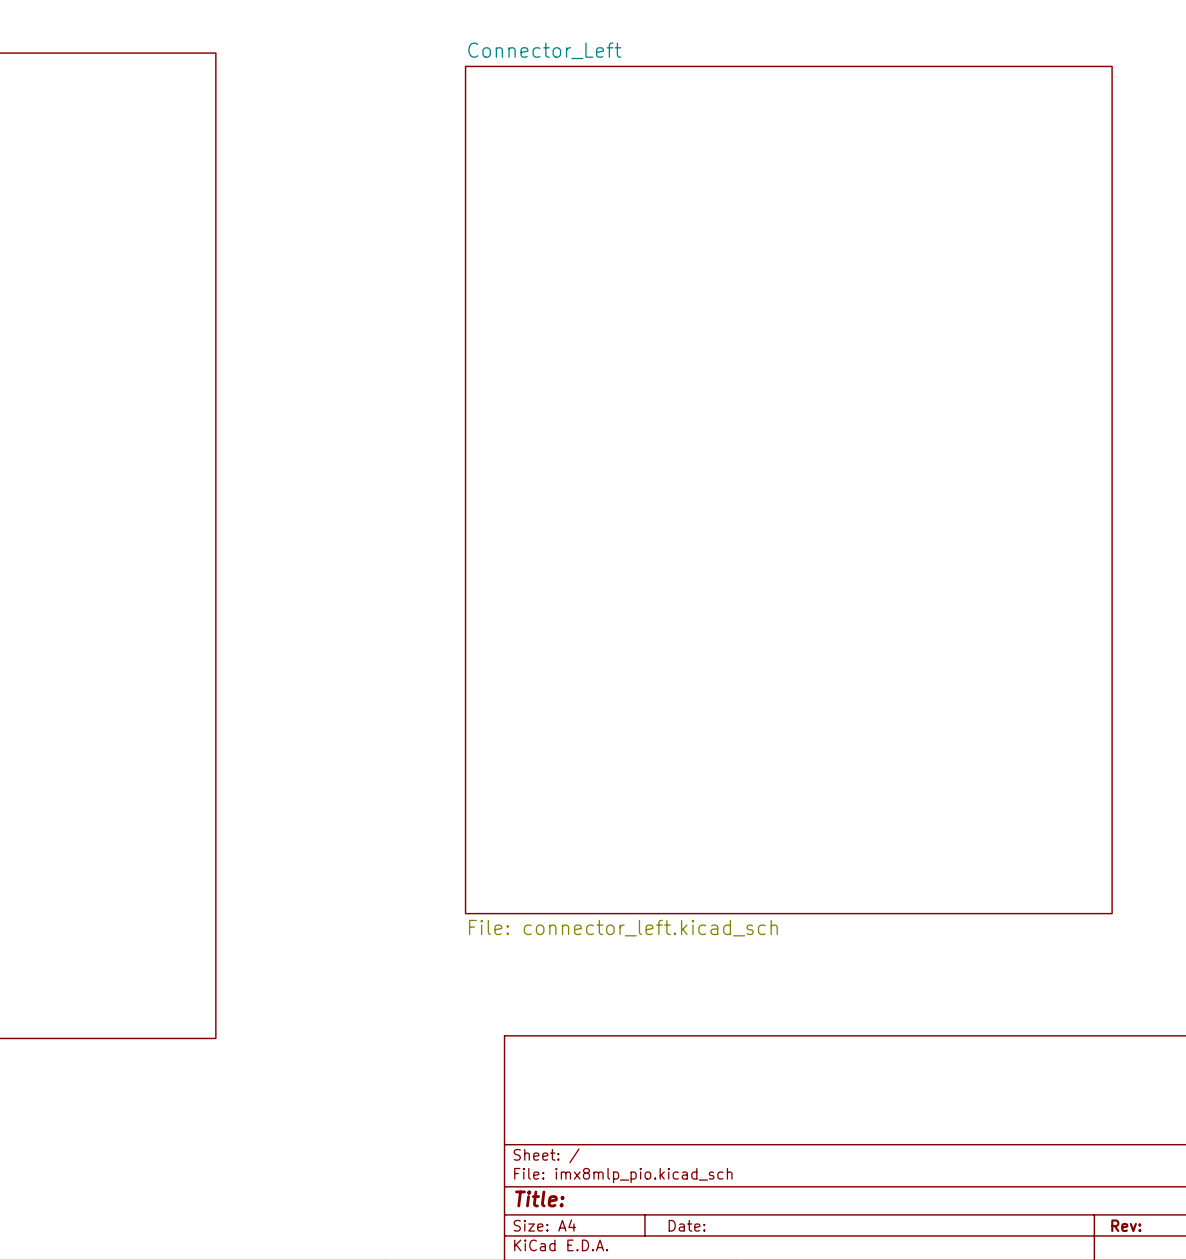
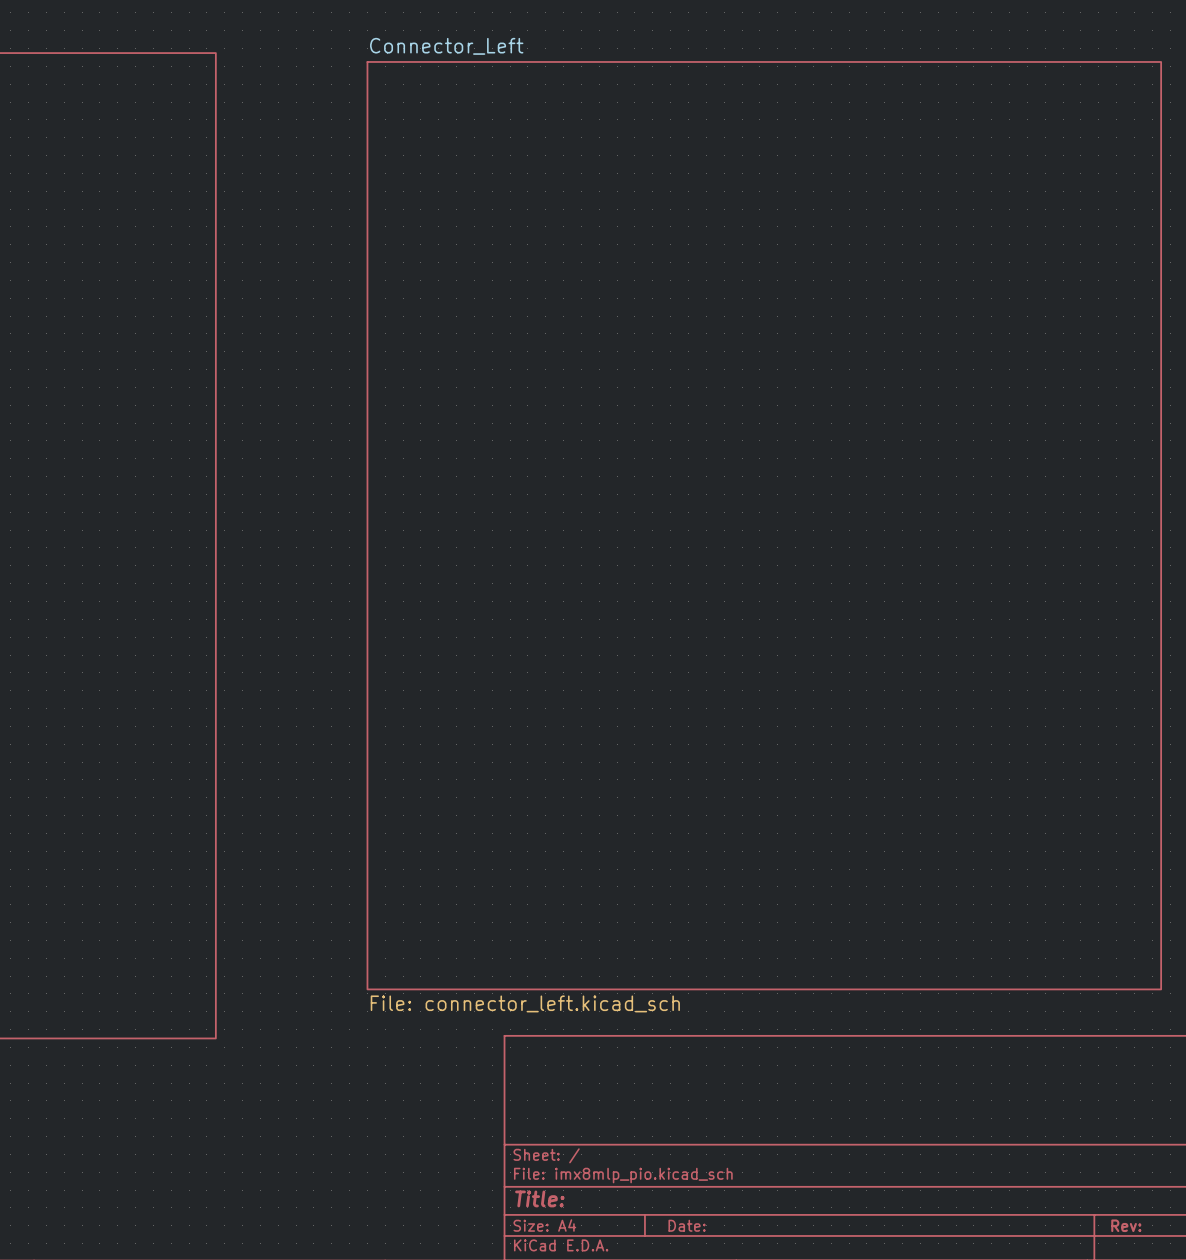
sheet Connector_Left: File: connector_left.kicad_sch (788, 490) -> none
sheet Connector_Left: none -> File: connector_left.kicad_sch (764, 525)

